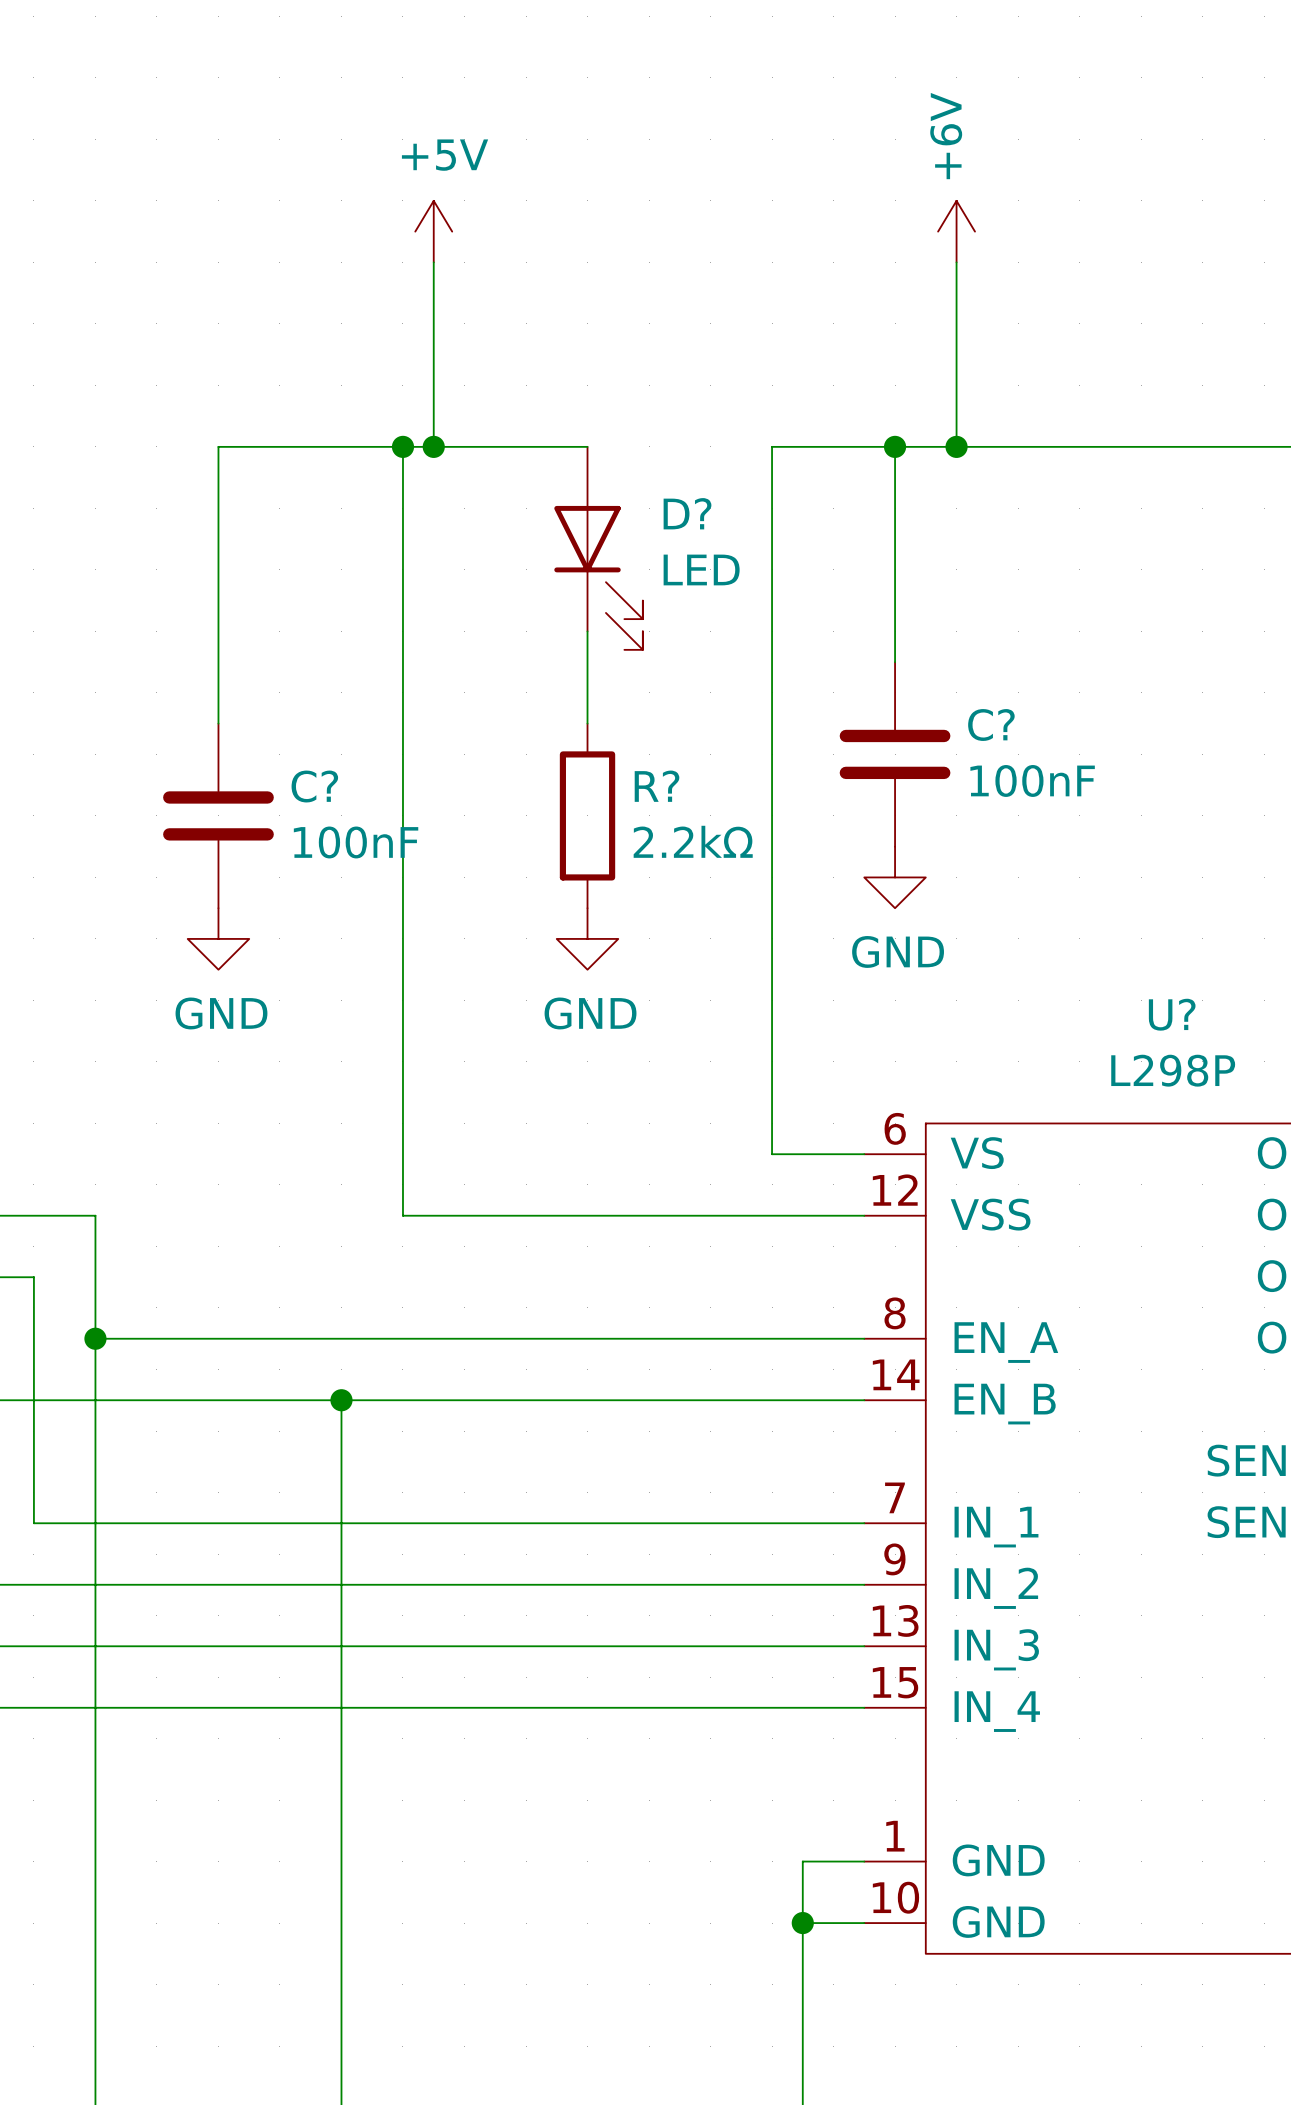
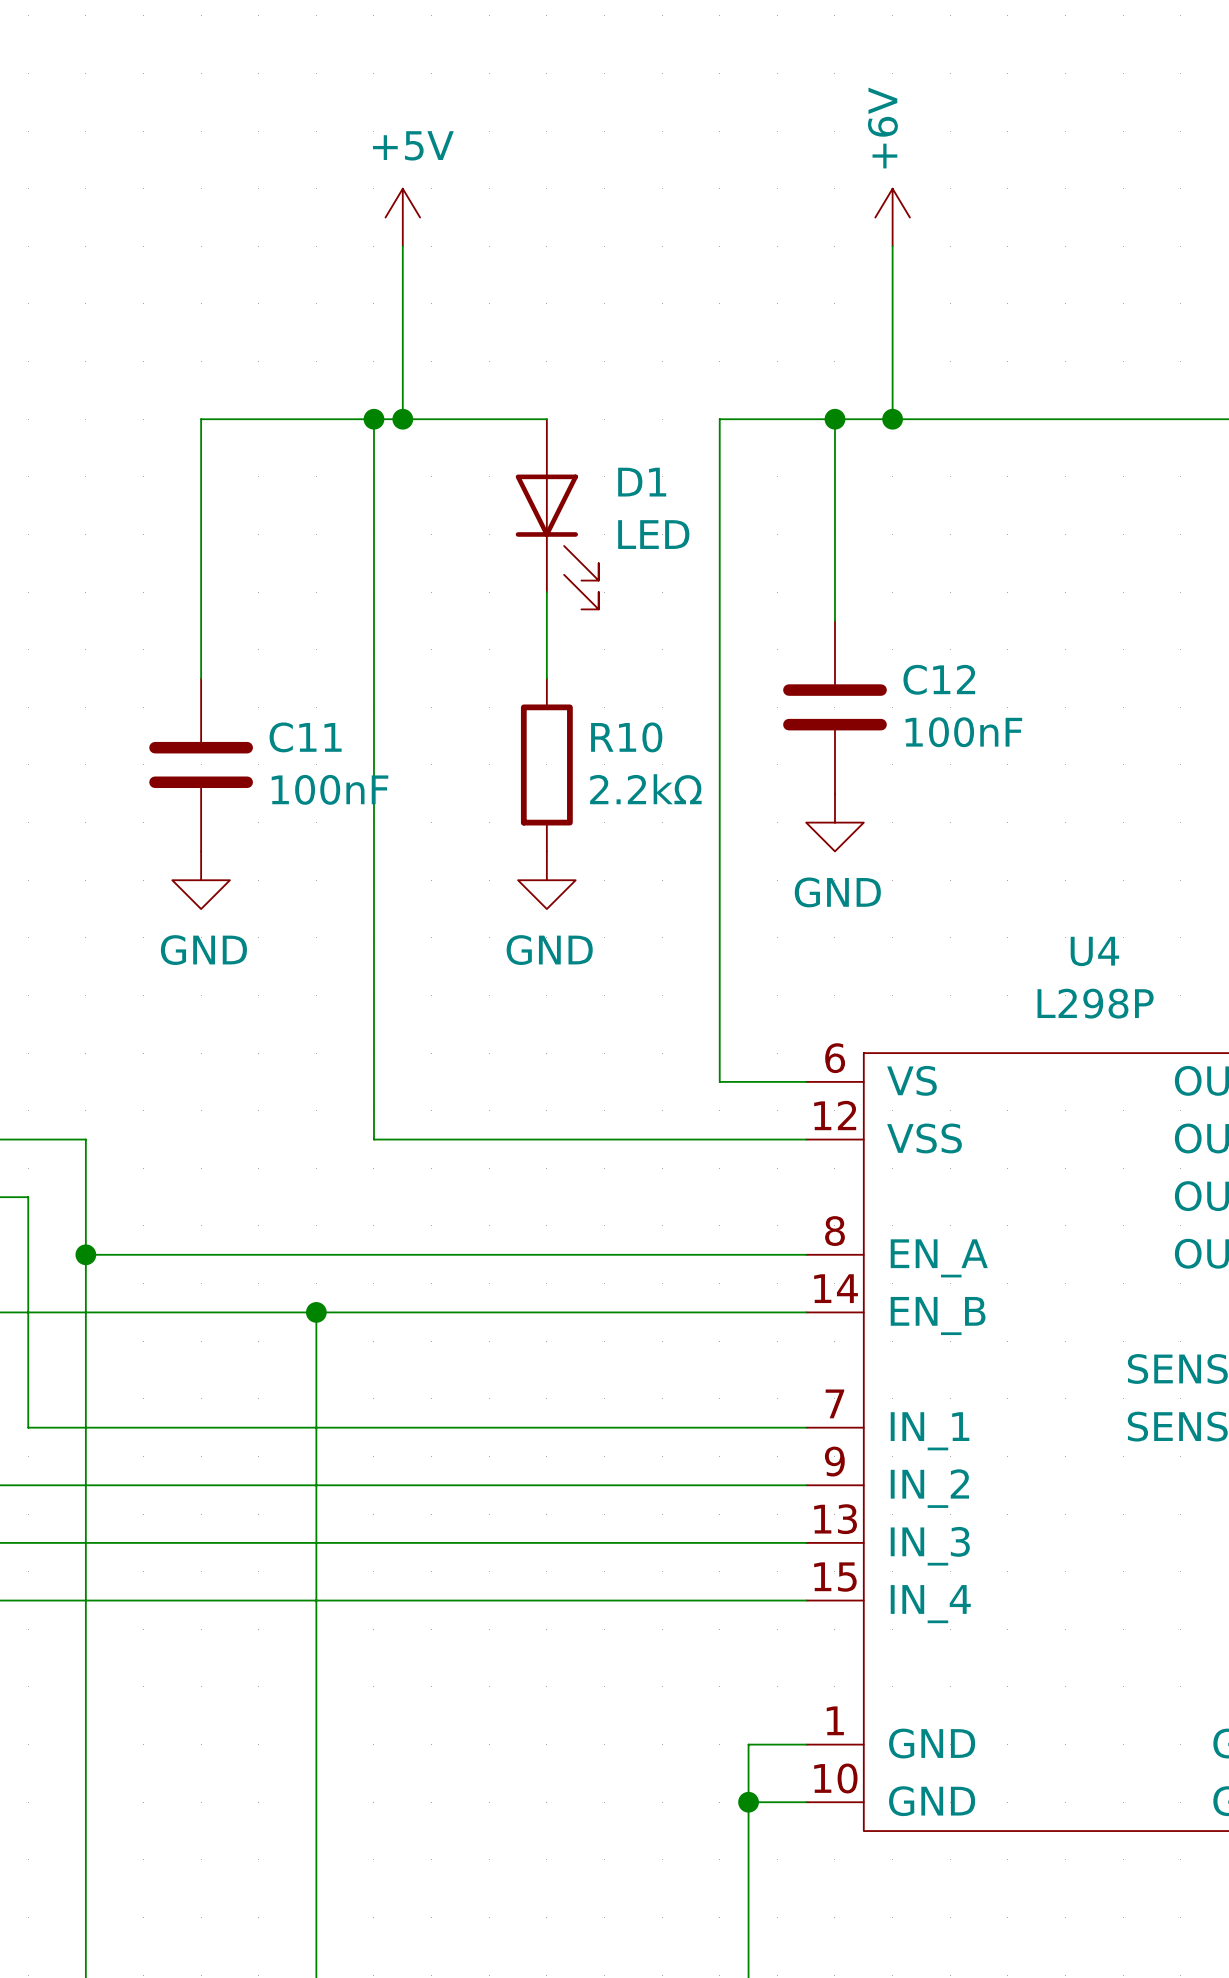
D? name: D? (687, 513) -> D1 (642, 482)
C? name: C? (991, 725) -> C12 (939, 679)
C? name: C? (314, 786) -> C11 (305, 737)
R? name: R? (657, 786) -> R10 (626, 737)
U? name: U? (1172, 1014) -> U4 (1094, 951)

